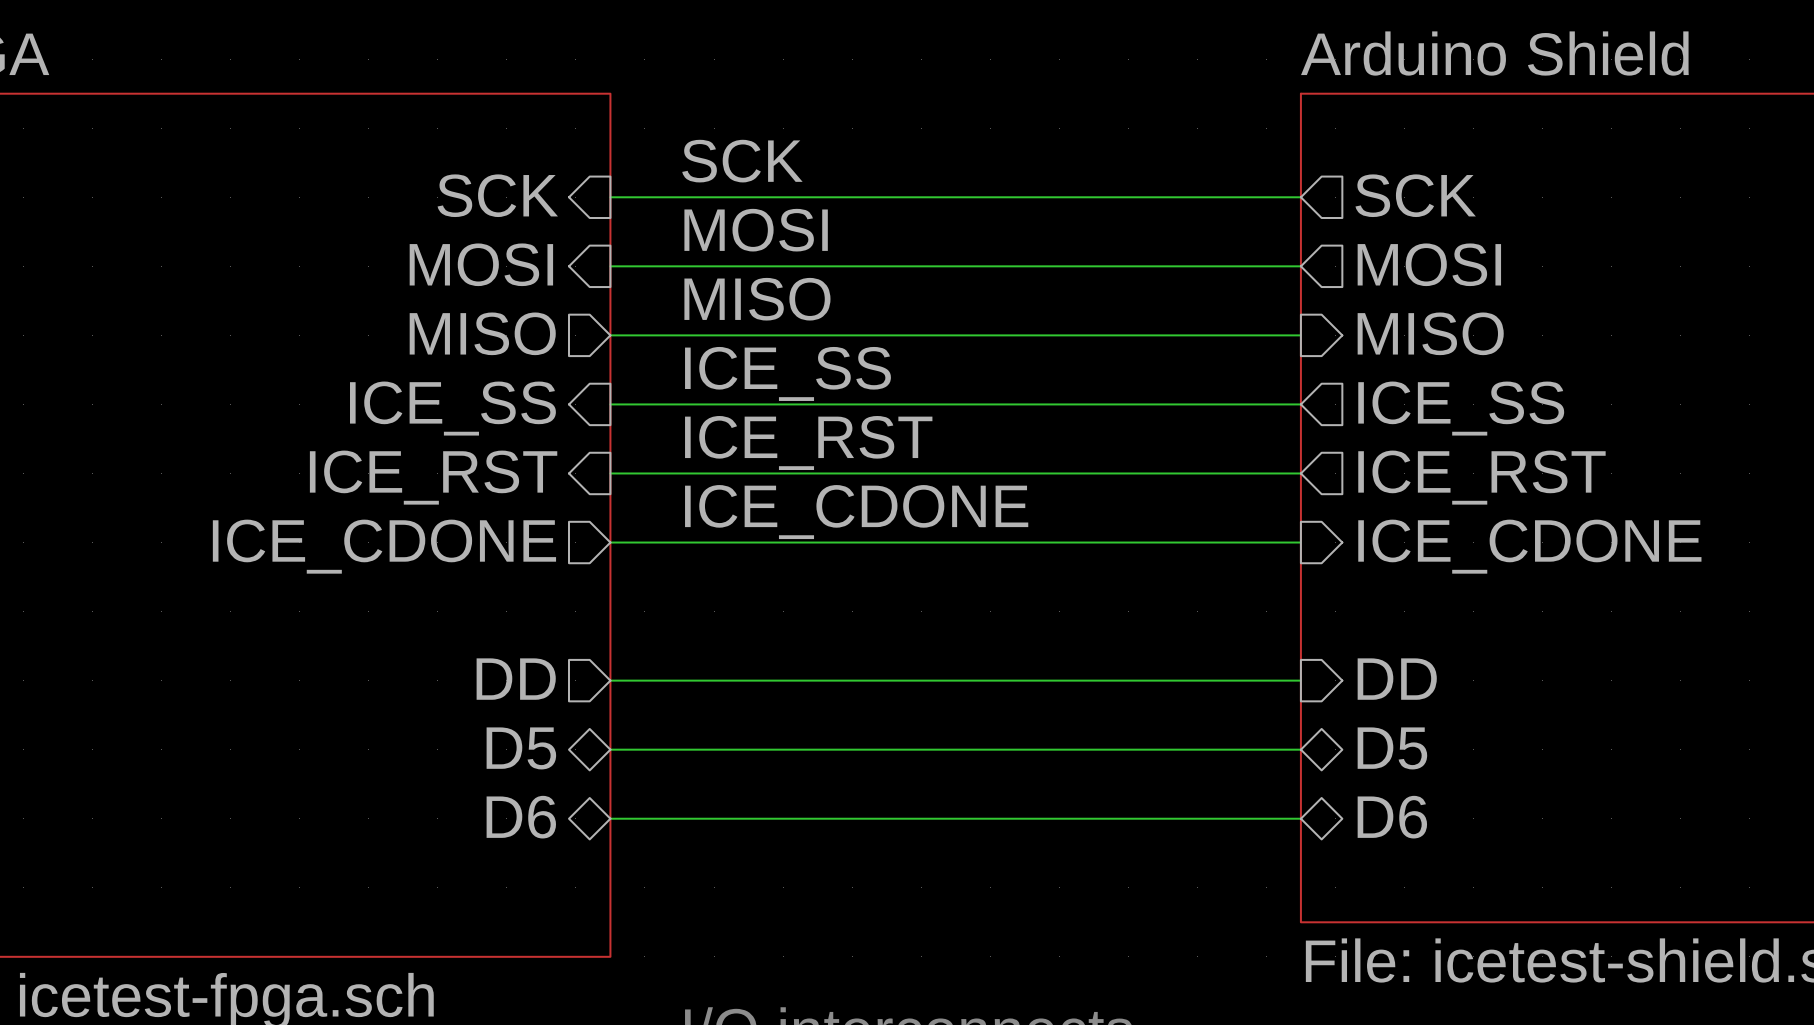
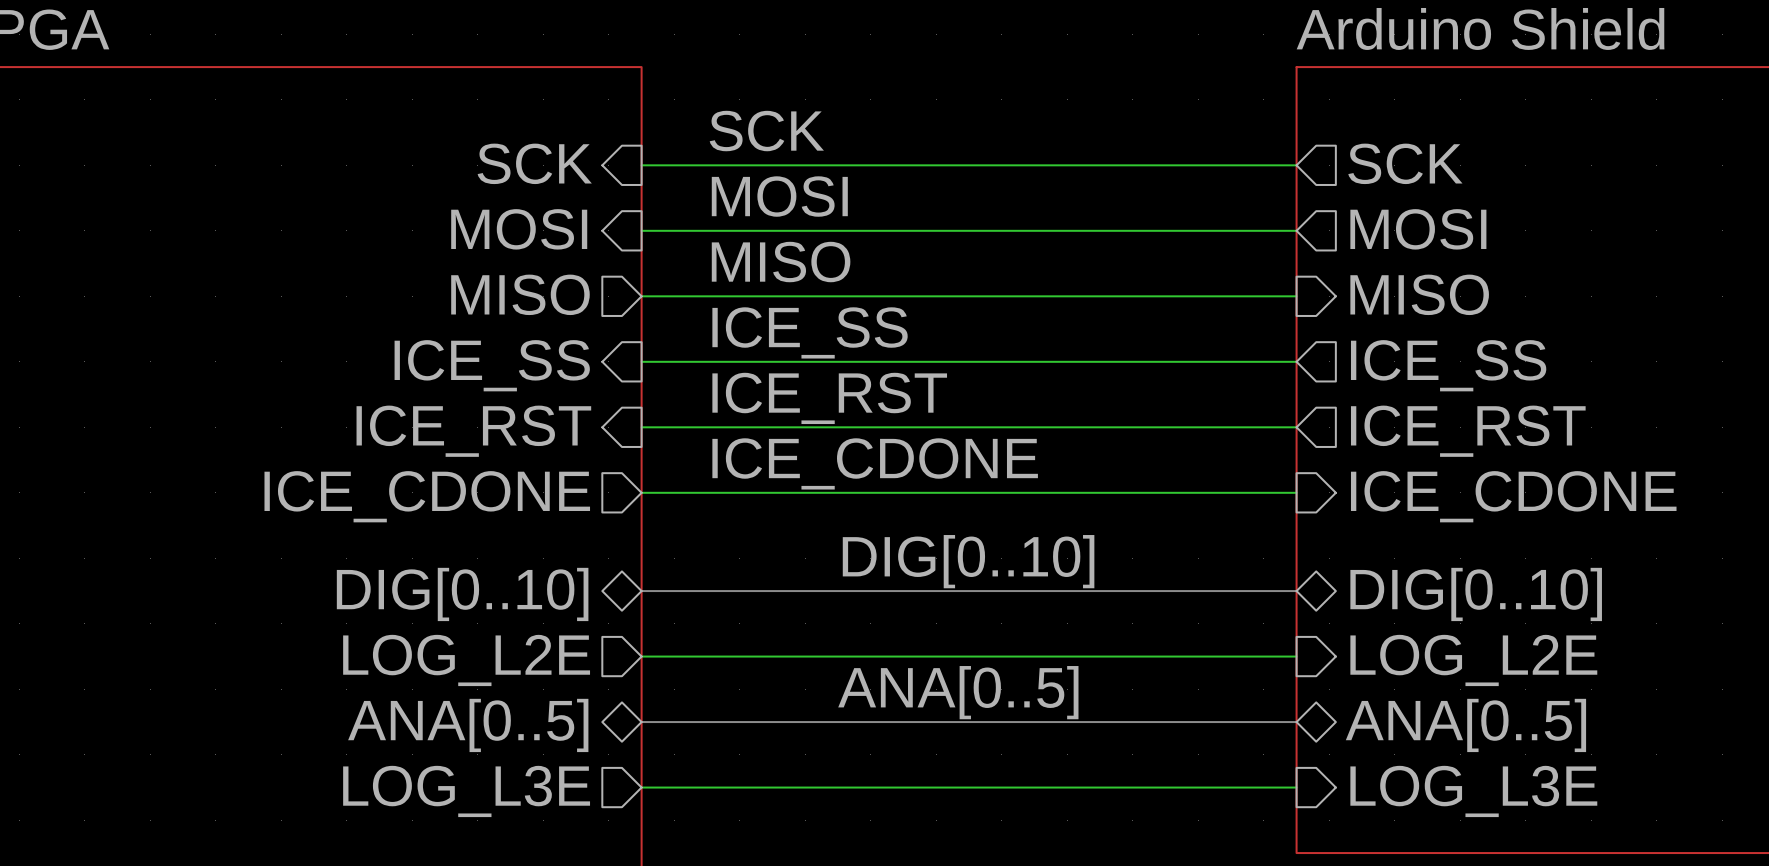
label: none -> DIG[0..10] (968, 561)
bus: none -> (641, 591) (1296, 591)
sheet pin: none -> DIG[0..10] (462, 594)
sheet pin: none -> DIG[0..10] (1476, 594)
sheet pin: DD (516, 679) -> none
sheet pin: DD (1397, 679) -> none
wire: (610, 680) (1300, 680) -> (641, 656) (1296, 656)
sheet pin: none -> LOG_L2E (466, 660)
sheet pin: none -> LOG_L2E (1473, 660)
sheet pin: D5 (521, 748) -> none
sheet pin: D5 (1392, 748) -> none
wire: (610, 749) (1300, 749) -> none
label: none -> ANA[0..5] (958, 692)
bus: none -> (641, 722) (1296, 722)
sheet pin: none -> ANA[0..5] (468, 725)
sheet pin: none -> ANA[0..5] (1465, 725)
sheet pin: D6 (521, 817) -> none
sheet pin: D6 (1392, 817) -> none
wire: (610, 818) (1300, 818) -> (641, 787) (1296, 787)
sheet pin: none -> LOG_L3E (466, 791)
sheet pin: none -> LOG_L3E (1473, 791)

